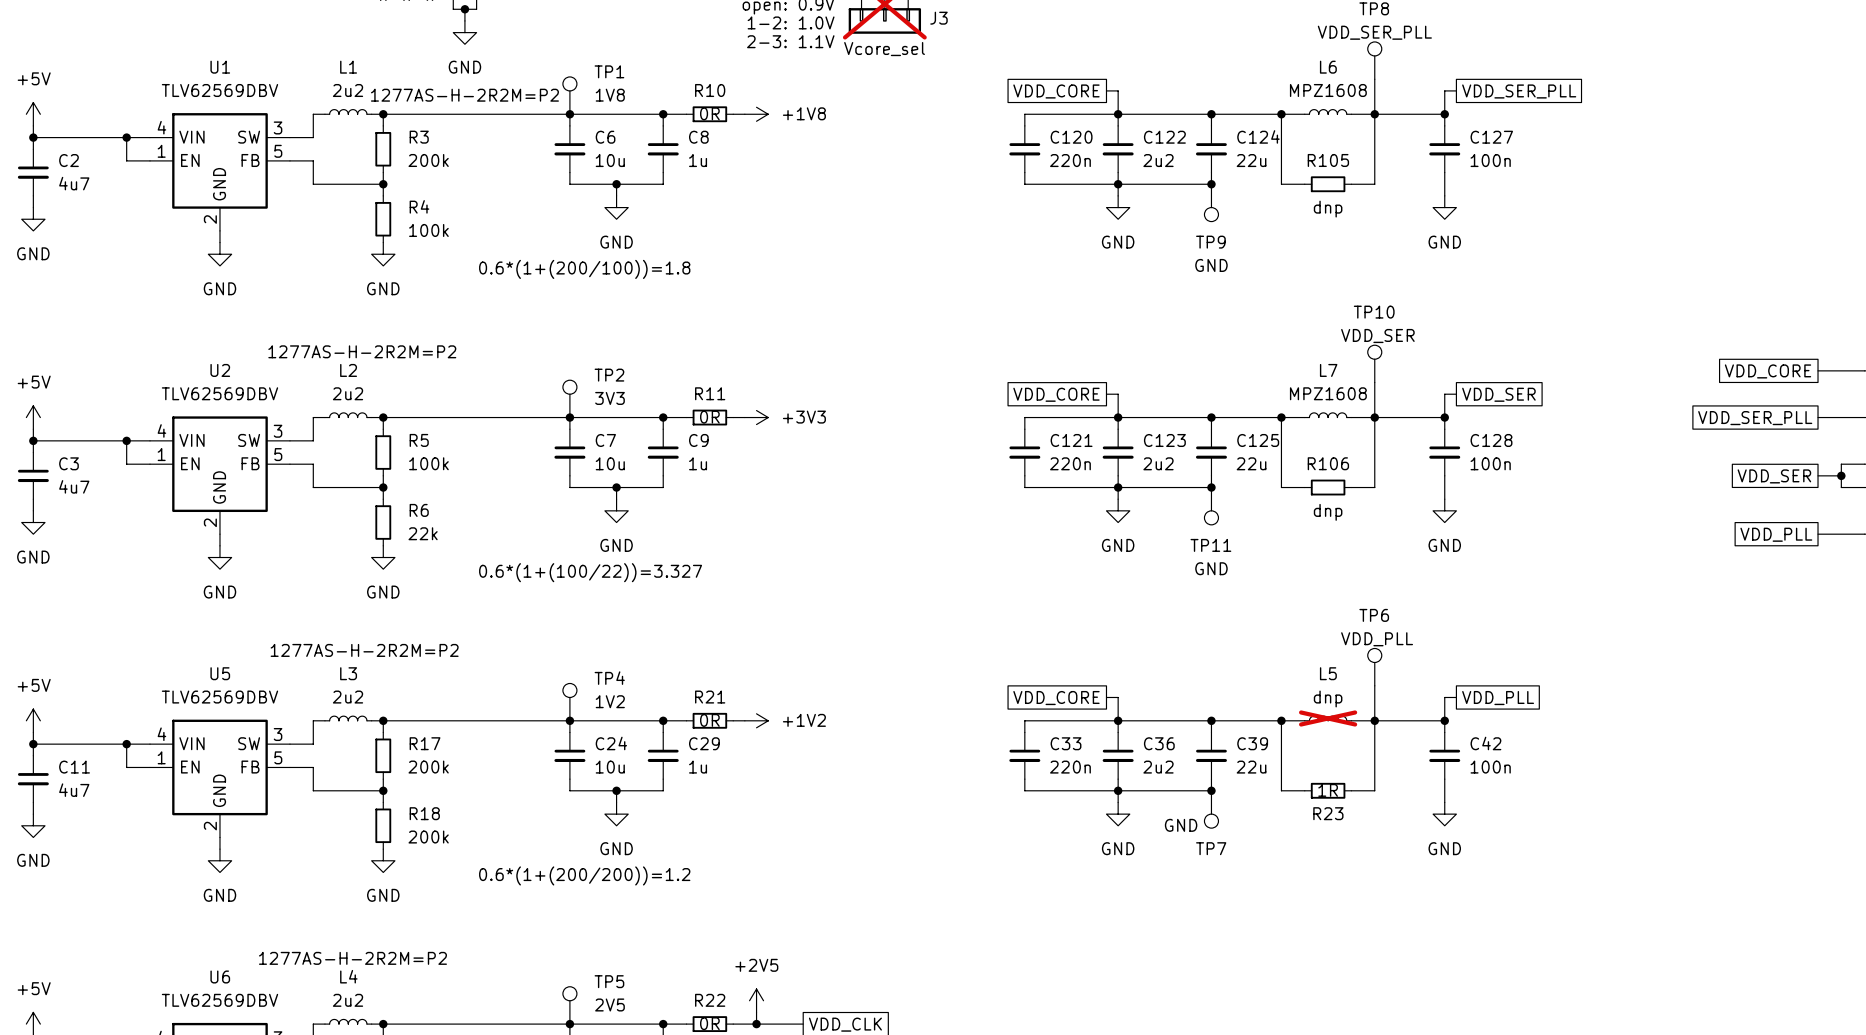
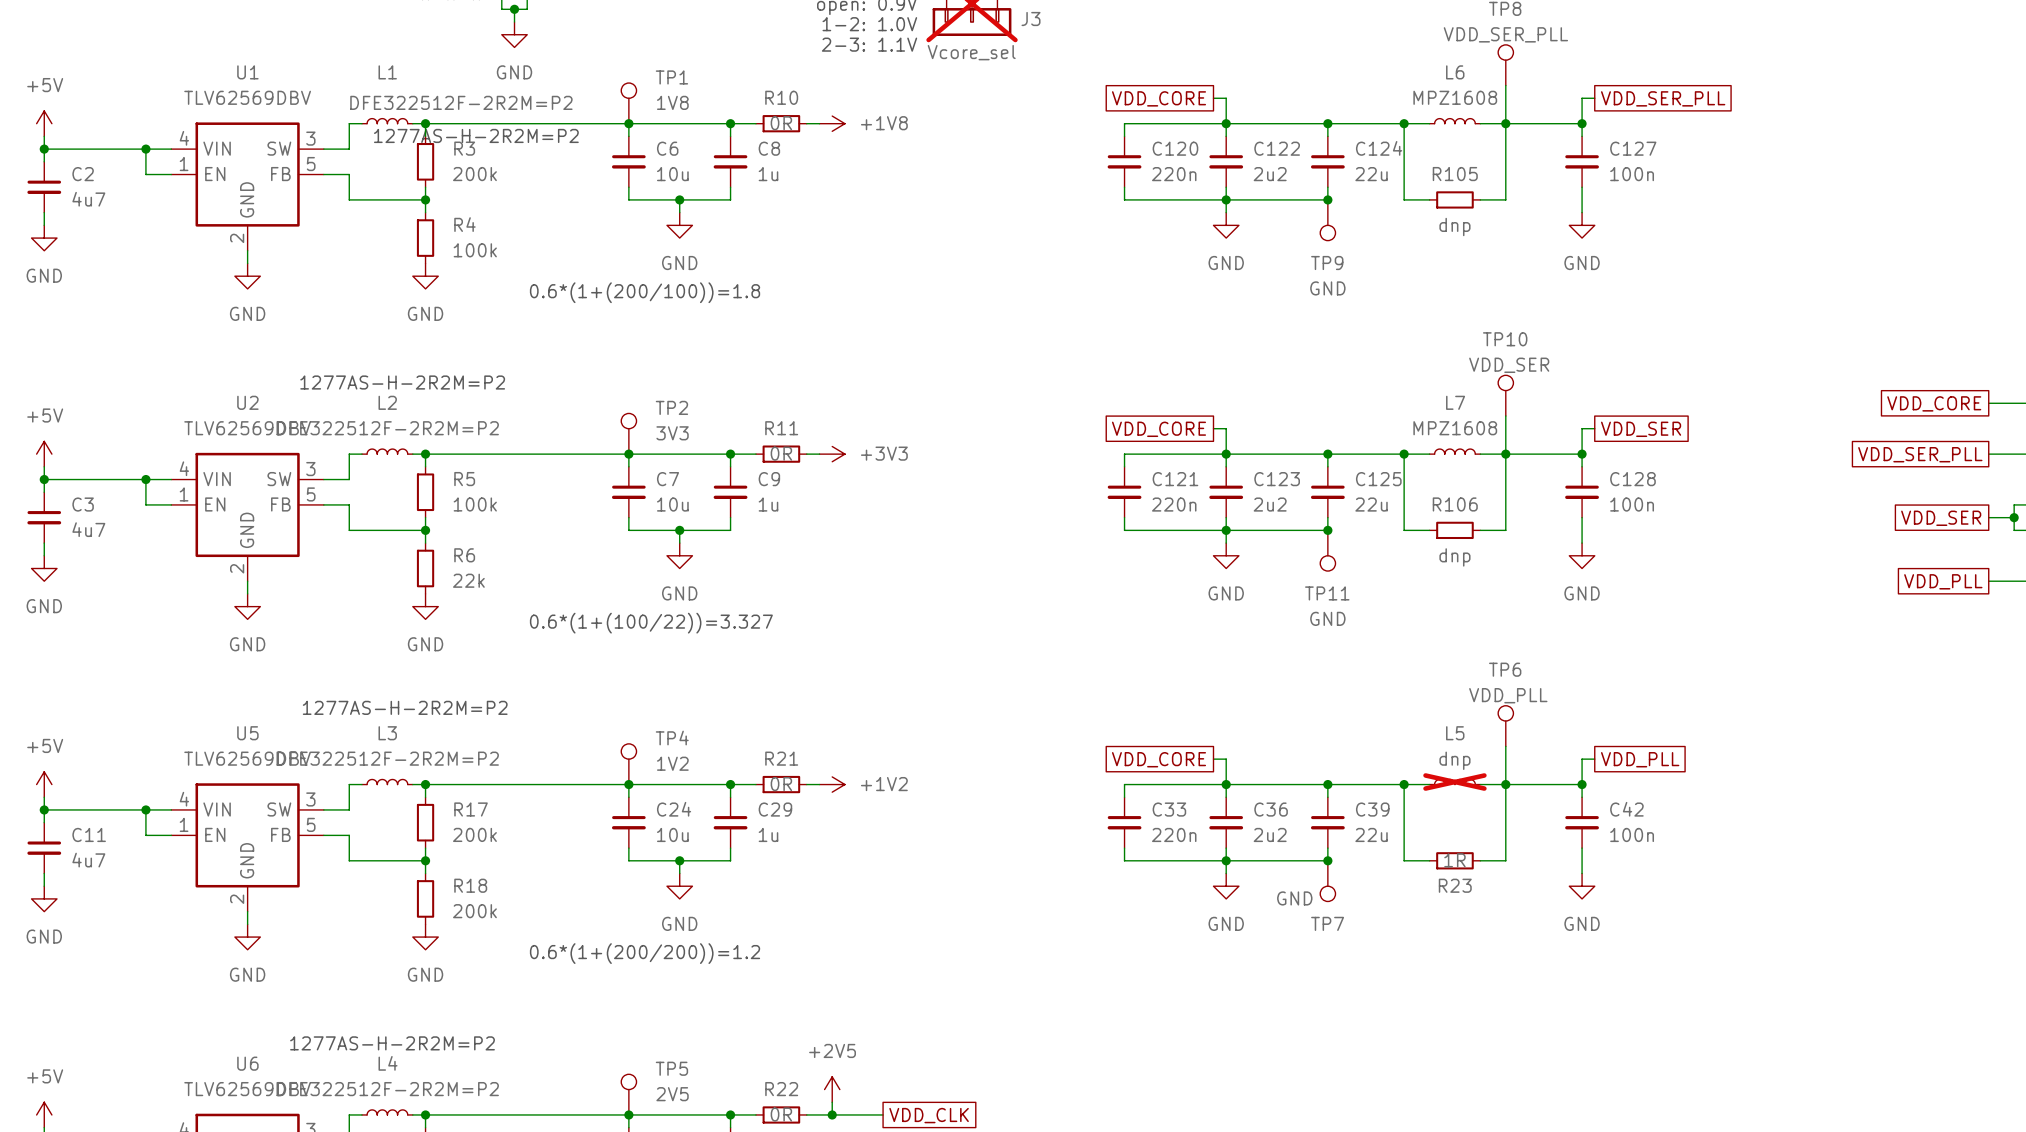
L1 value: 2u2 (348, 90) -> DFE322512F-2R2M=P2 (461, 102)
text position: 1277AS-H-2R2M=P2 (464, 95) -> 1277AS-H-2R2M=P2 (476, 135)
L2 value: 2u2 (348, 393) -> DFE322512F-2R2M=P2 (387, 428)
L3 value: 2u2 (348, 697) -> DFE322512F-2R2M=P2 (387, 758)
L4 value: 2u2 (348, 1000) -> DFE322512F-2R2M=P2 (387, 1089)

